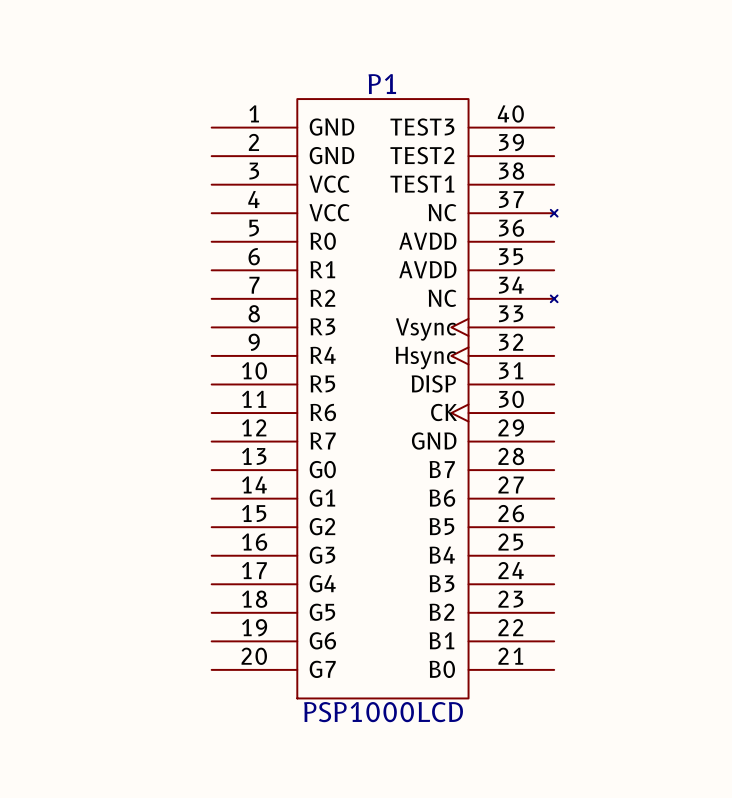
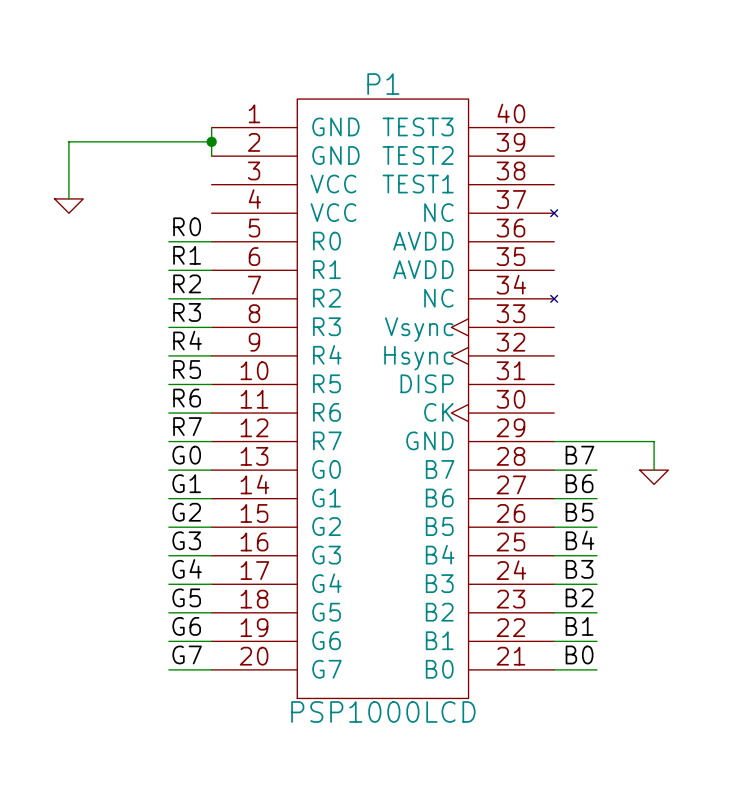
wire: none -> (211, 127) (211, 156)
wire: none -> (211, 141) (68, 141) (68, 198)
junction: none -> (211, 141)
power symbol: none -> (68, 206)
label: none -> R0 (187, 226)
wire: none -> (168, 241) (211, 241)
label: none -> R1 (187, 255)
wire: none -> (168, 270) (211, 270)
label: none -> R2 (187, 283)
wire: none -> (168, 298) (211, 298)
label: none -> R3 (187, 312)
wire: none -> (168, 327) (211, 327)
label: none -> R4 (187, 340)
wire: none -> (168, 355) (211, 355)
label: none -> R5 (187, 369)
wire: none -> (168, 384) (211, 384)
label: none -> R6 (187, 398)
wire: none -> (168, 413) (211, 413)
label: none -> R7 (187, 426)
wire: none -> (168, 441) (211, 441)
wire: none -> (554, 441) (654, 441) (654, 470)
label: none -> G0 (186, 455)
label: none -> B7 (579, 455)
wire: none -> (168, 470) (211, 470)
wire: none -> (554, 470) (596, 470)
power symbol: none -> (654, 477)
label: none -> G1 (186, 483)
label: none -> B6 (579, 483)
wire: none -> (168, 498) (211, 498)
wire: none -> (554, 498) (596, 498)
label: none -> G2 (186, 512)
label: none -> B5 (579, 512)
wire: none -> (168, 527) (211, 527)
wire: none -> (554, 527) (596, 527)
label: none -> G3 (186, 540)
label: none -> B4 (579, 540)
wire: none -> (168, 555) (211, 555)
wire: none -> (554, 555) (596, 555)
label: none -> G4 (187, 568)
label: none -> B3 (579, 569)
wire: none -> (168, 584) (211, 584)
wire: none -> (554, 584) (596, 584)
label: none -> G5 (186, 597)
label: none -> B2 (579, 597)
wire: none -> (168, 612) (211, 612)
wire: none -> (554, 612) (596, 612)
label: none -> G6 (186, 626)
label: none -> B1 (579, 626)
wire: none -> (168, 641) (211, 641)
wire: none -> (554, 641) (596, 641)
label: none -> G7 (187, 654)
label: none -> B0 (579, 654)
wire: none -> (168, 669) (211, 669)
wire: none -> (554, 669) (596, 669)

